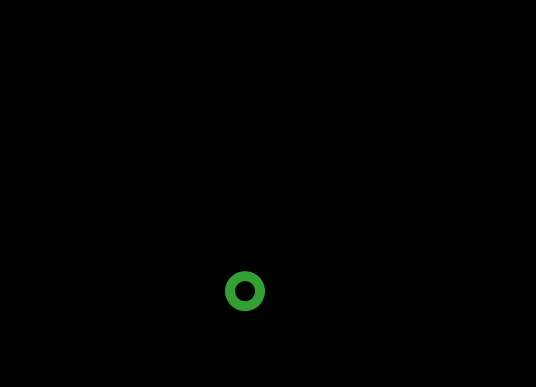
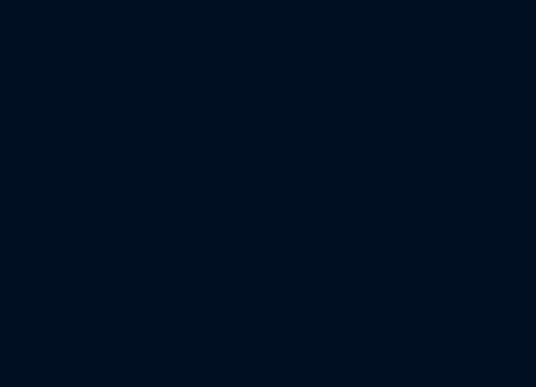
via: (245, 291) -> none

